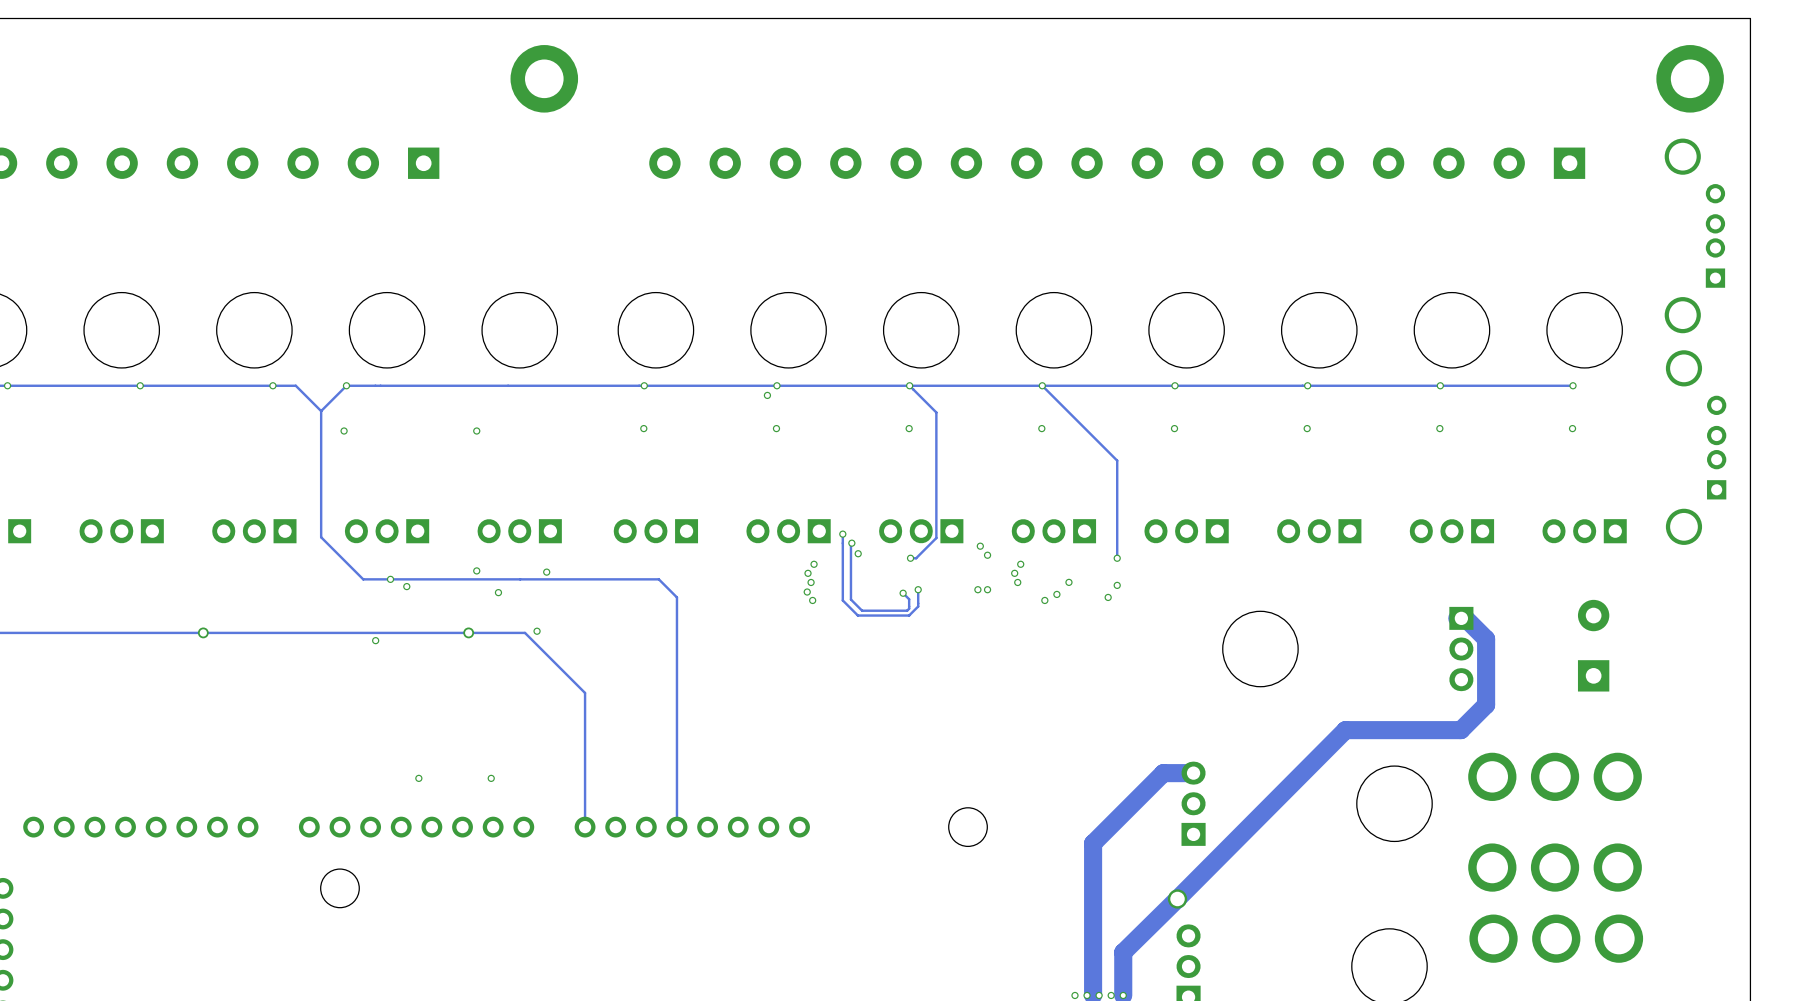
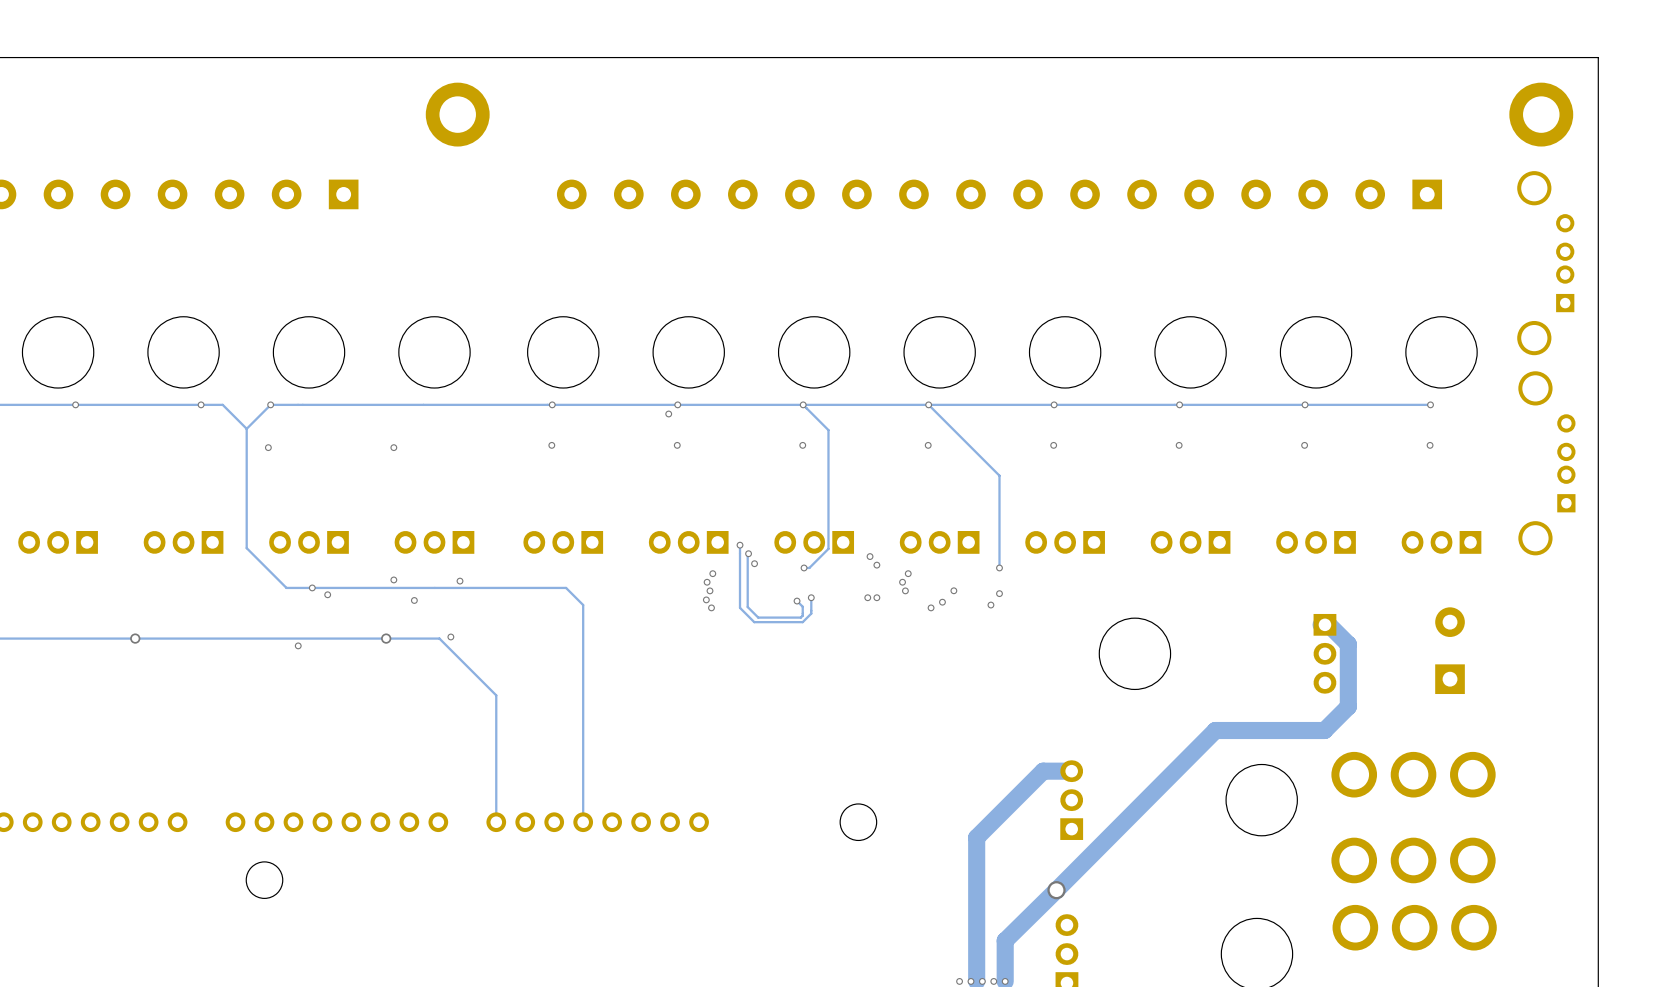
via: (418, 778) -> none
via: (491, 778) -> none

